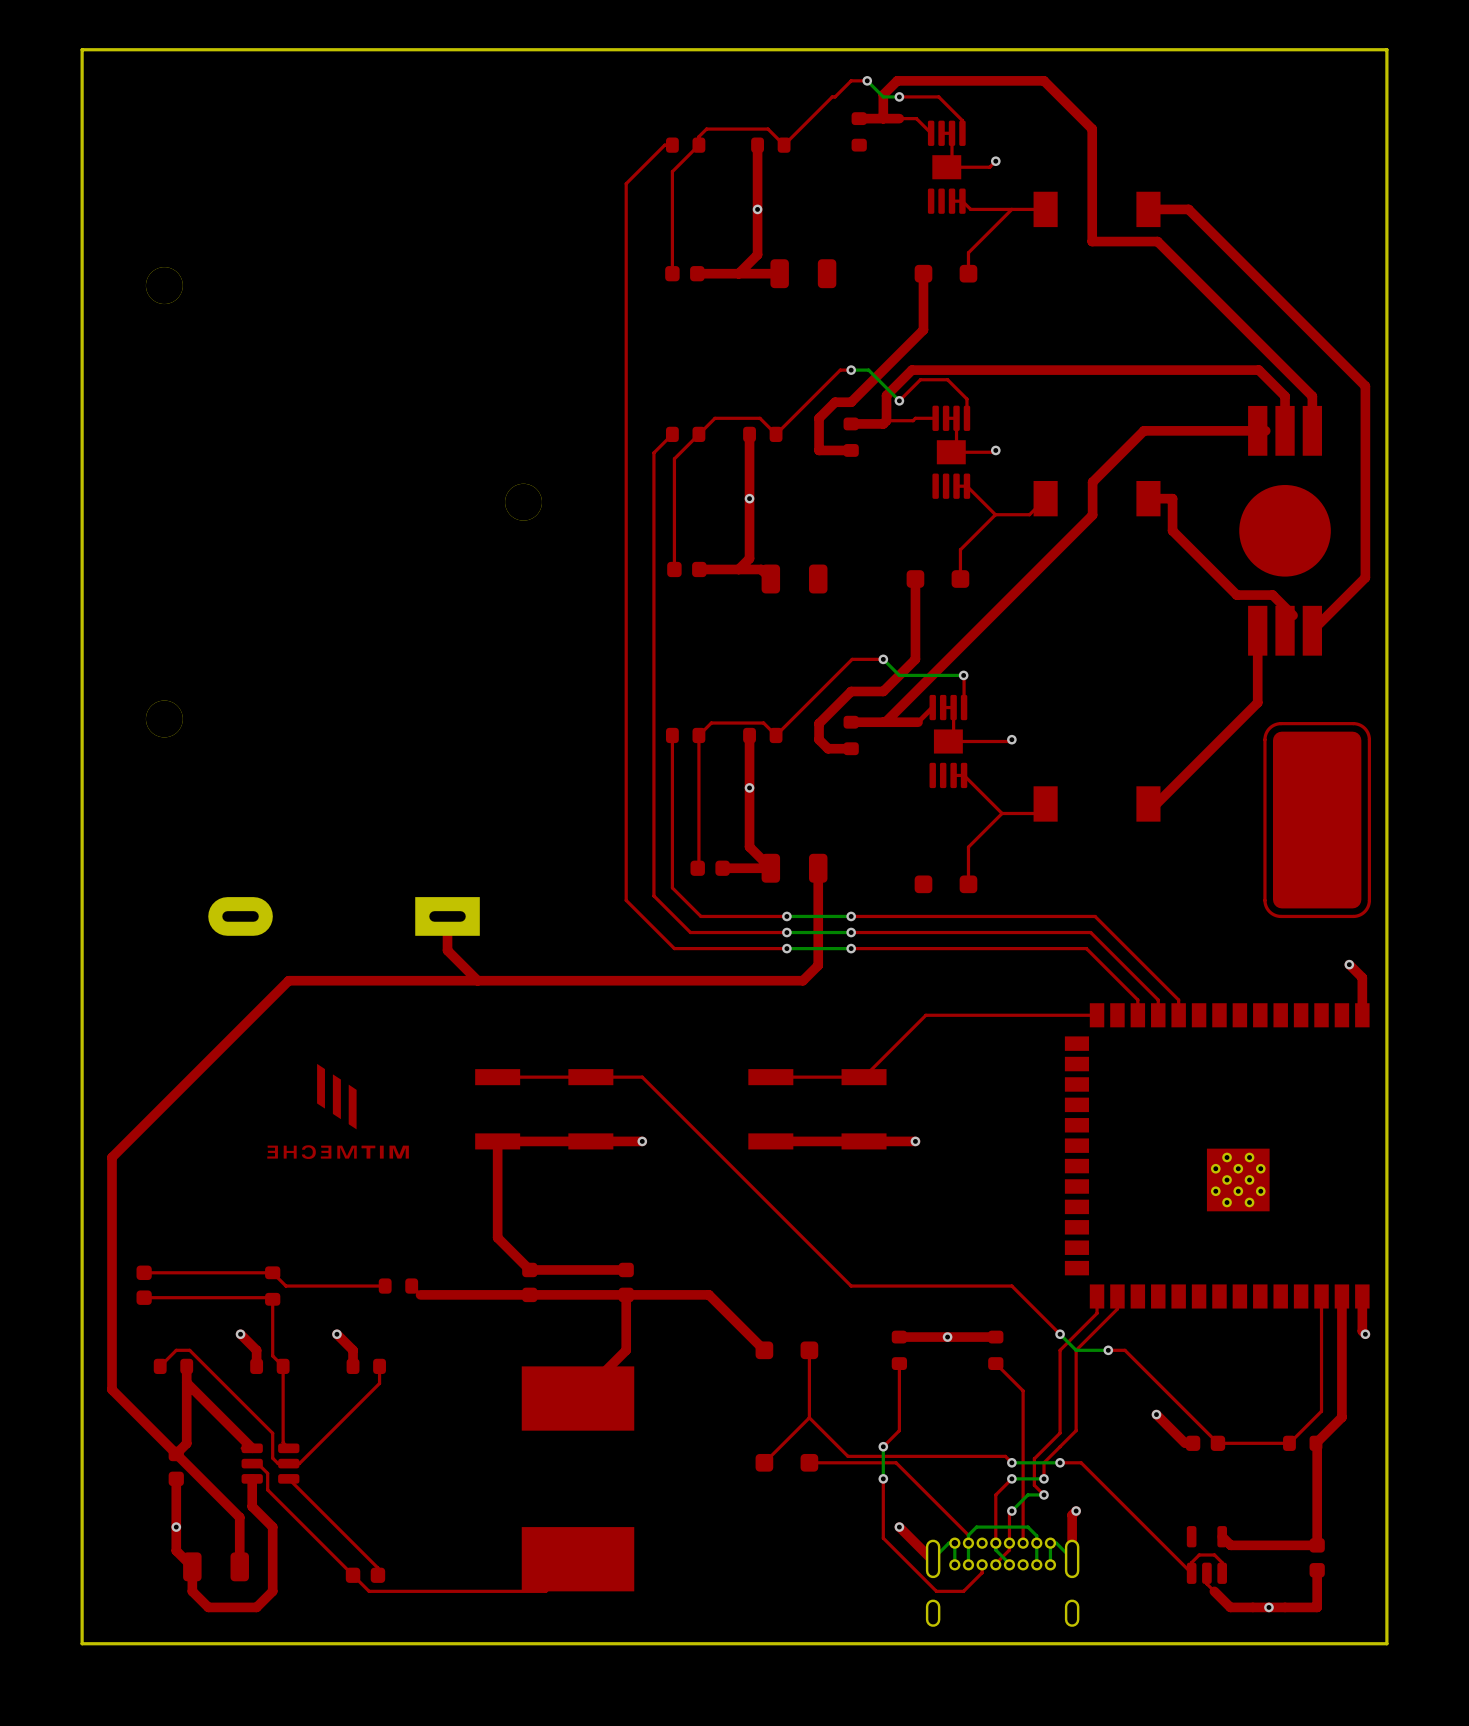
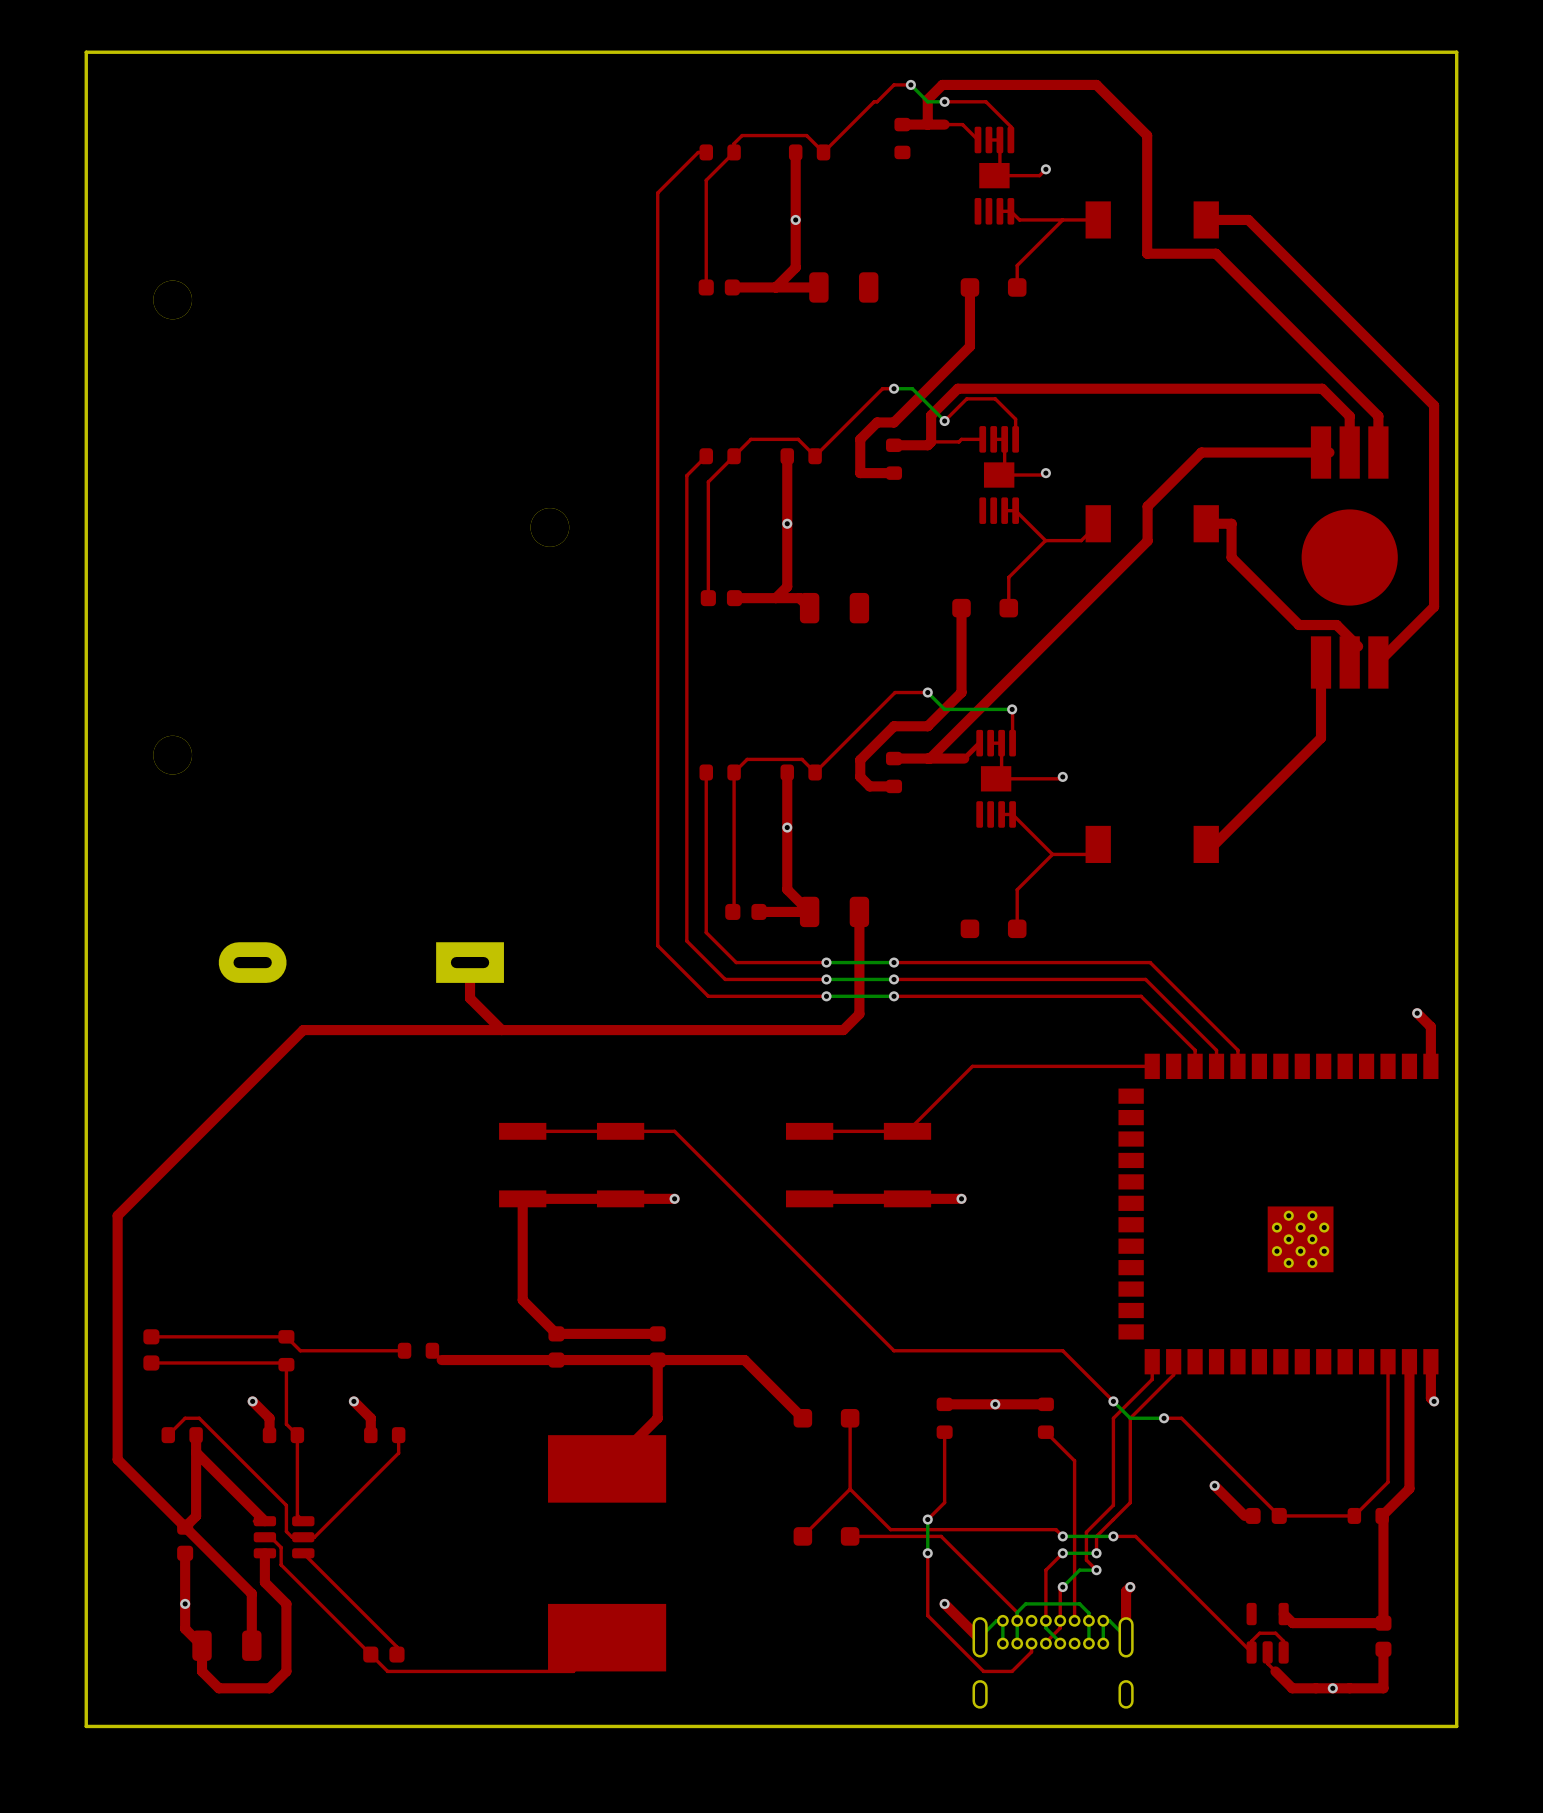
part: (1317, 820) -> none
drawing: [267, 1063, 409, 1159] -> none

